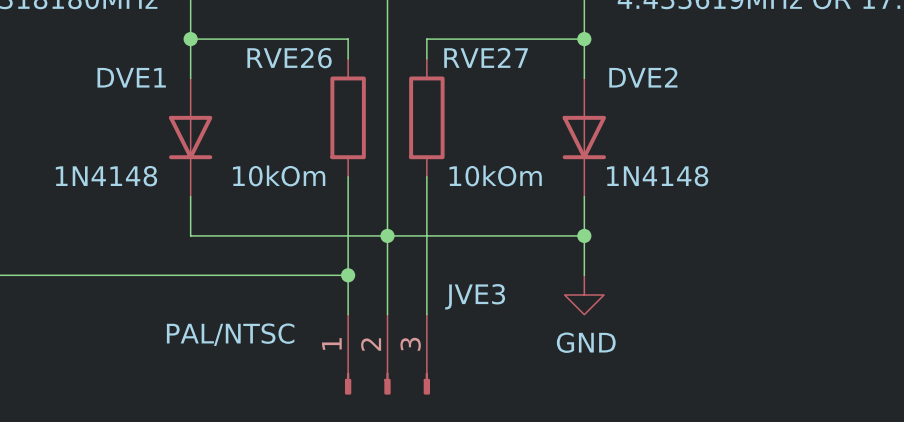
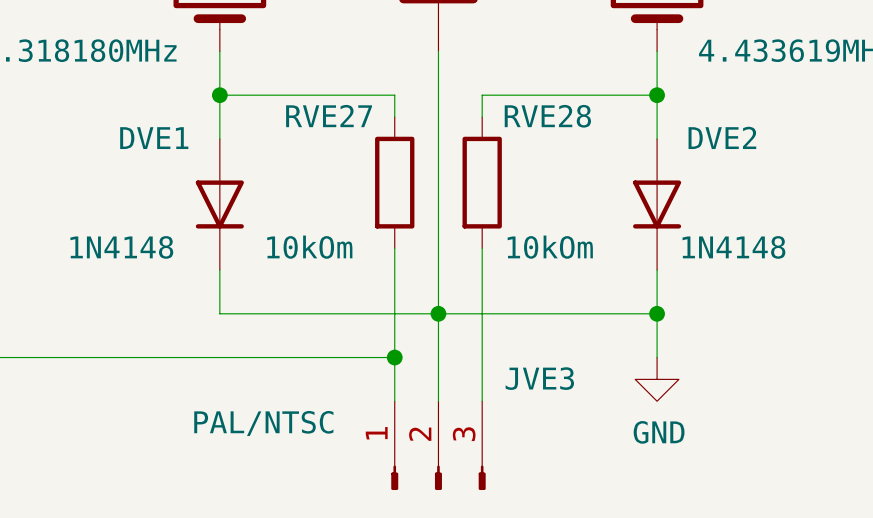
RVE27 name: RVE27 (486, 57) -> RVE28 (547, 116)
RVE26 name: RVE26 (289, 58) -> RVE27 (329, 116)

